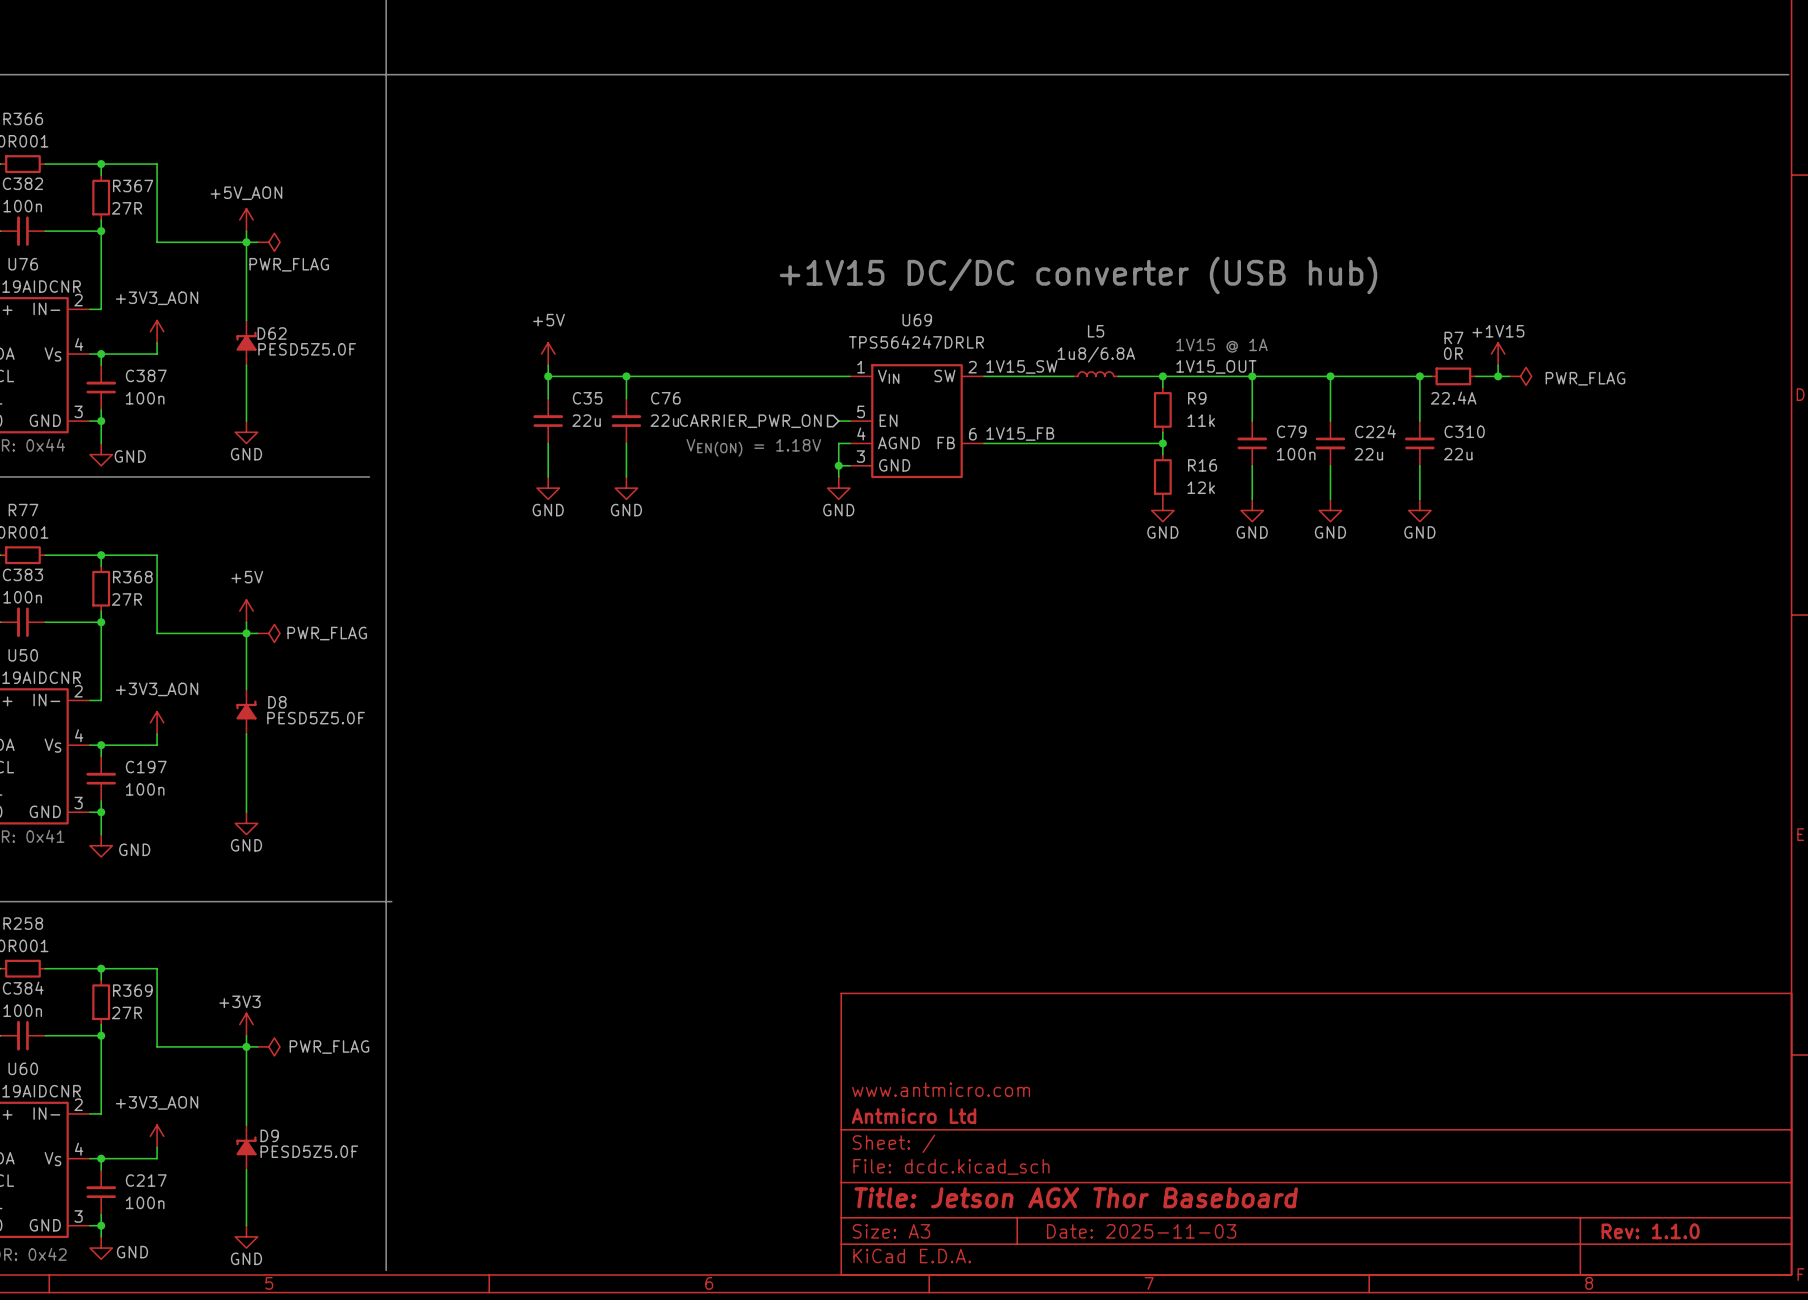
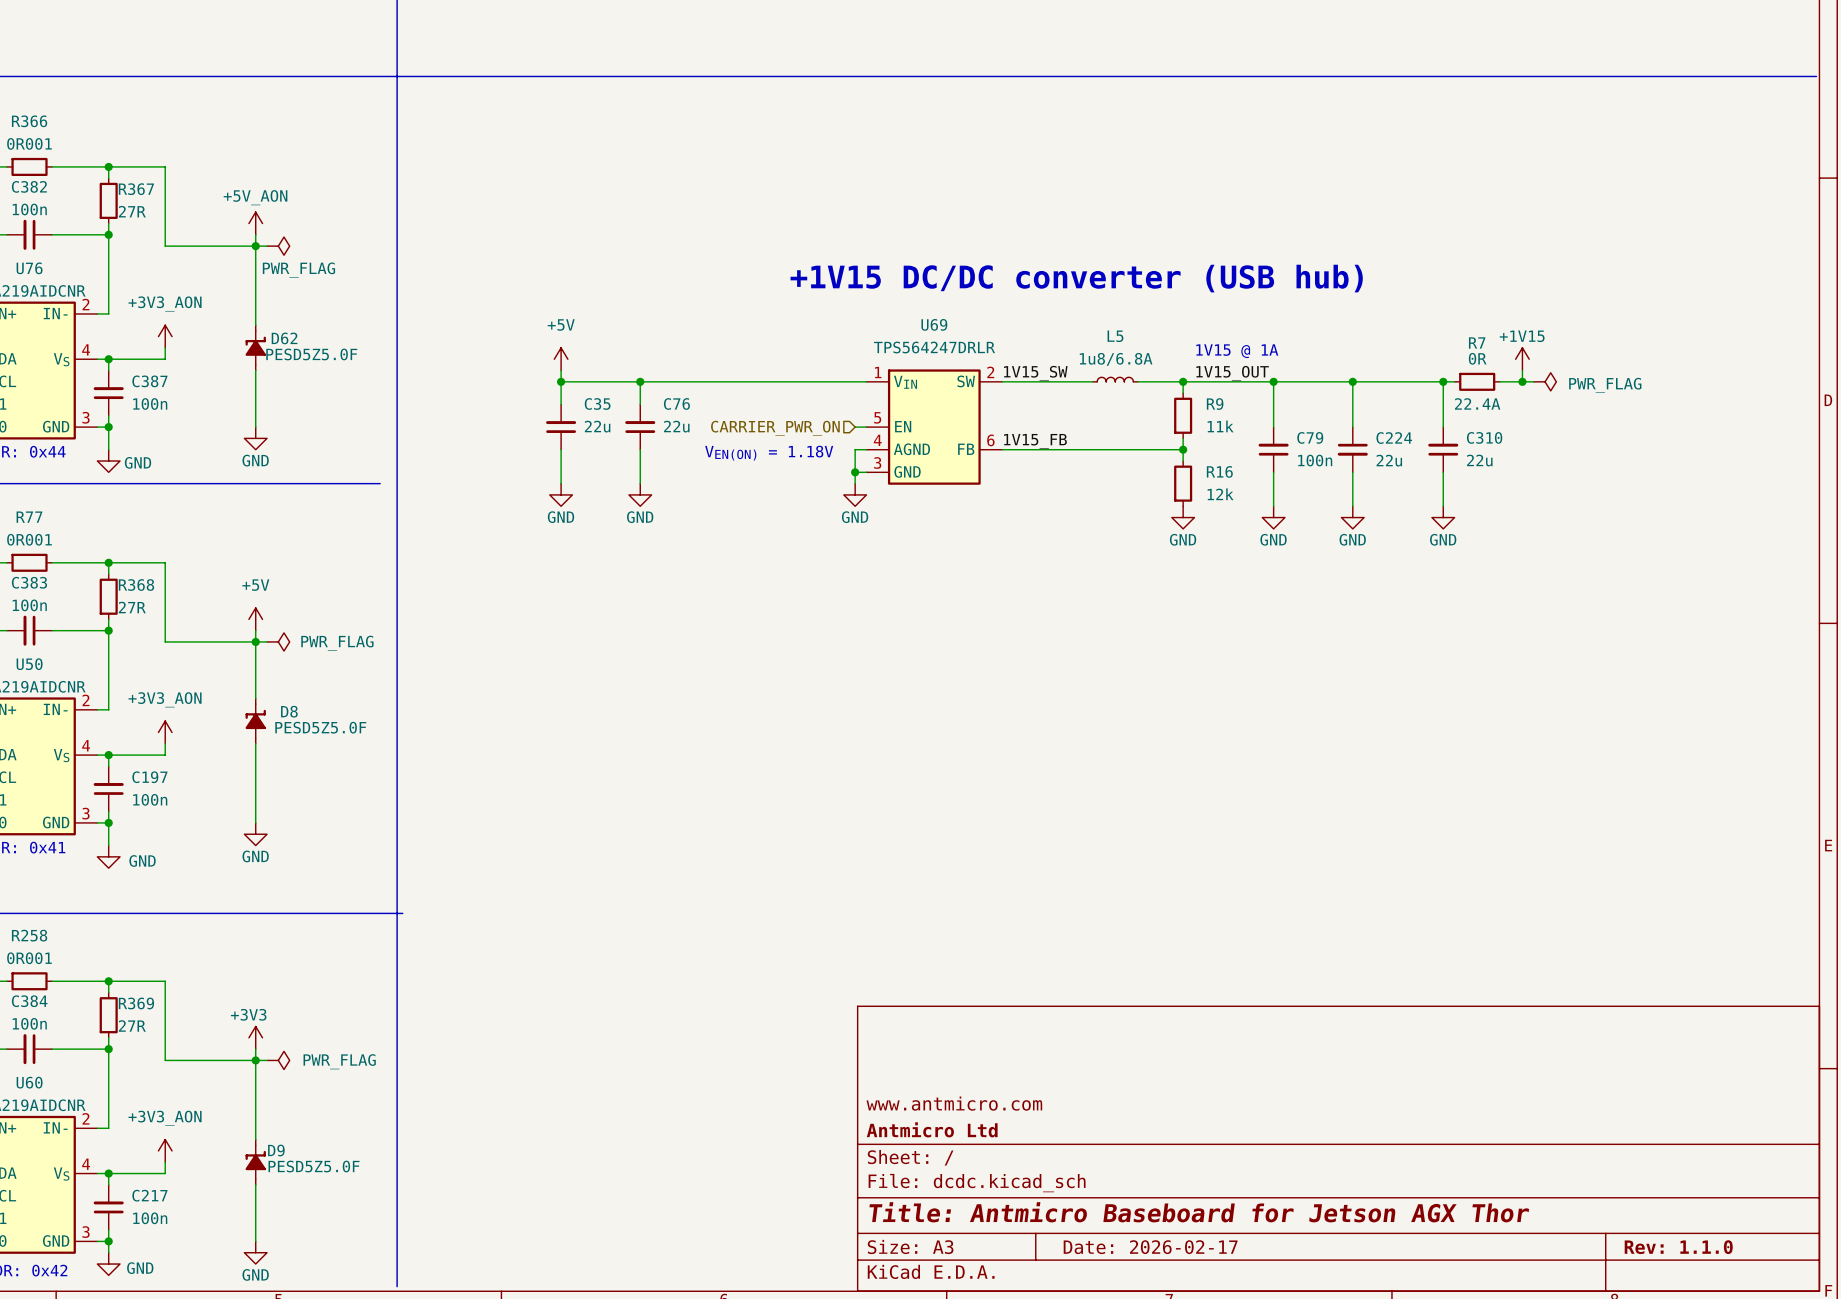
title block: Title: Jetson AGX Thor Baseboard (1076, 1197) -> Title: Antmicro Baseboard for Jetson AGX Thor (1199, 1212)
title block: Date: 2025-11-03 (1141, 1231) -> Date: 2026-02-17 (1150, 1247)

